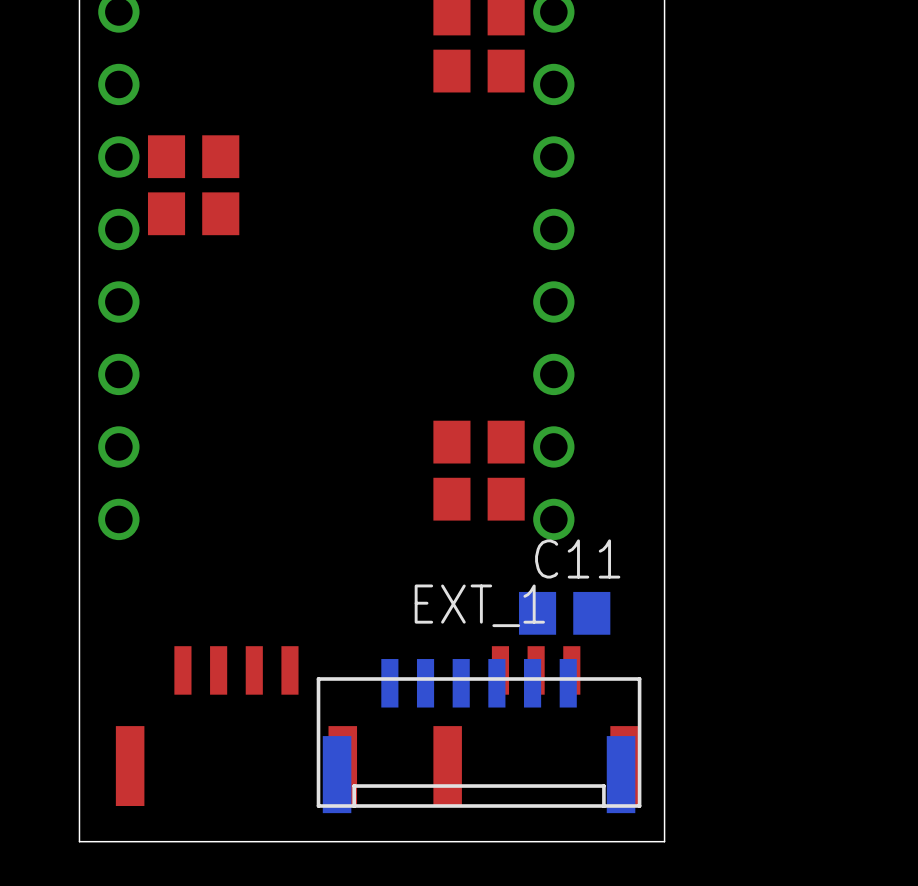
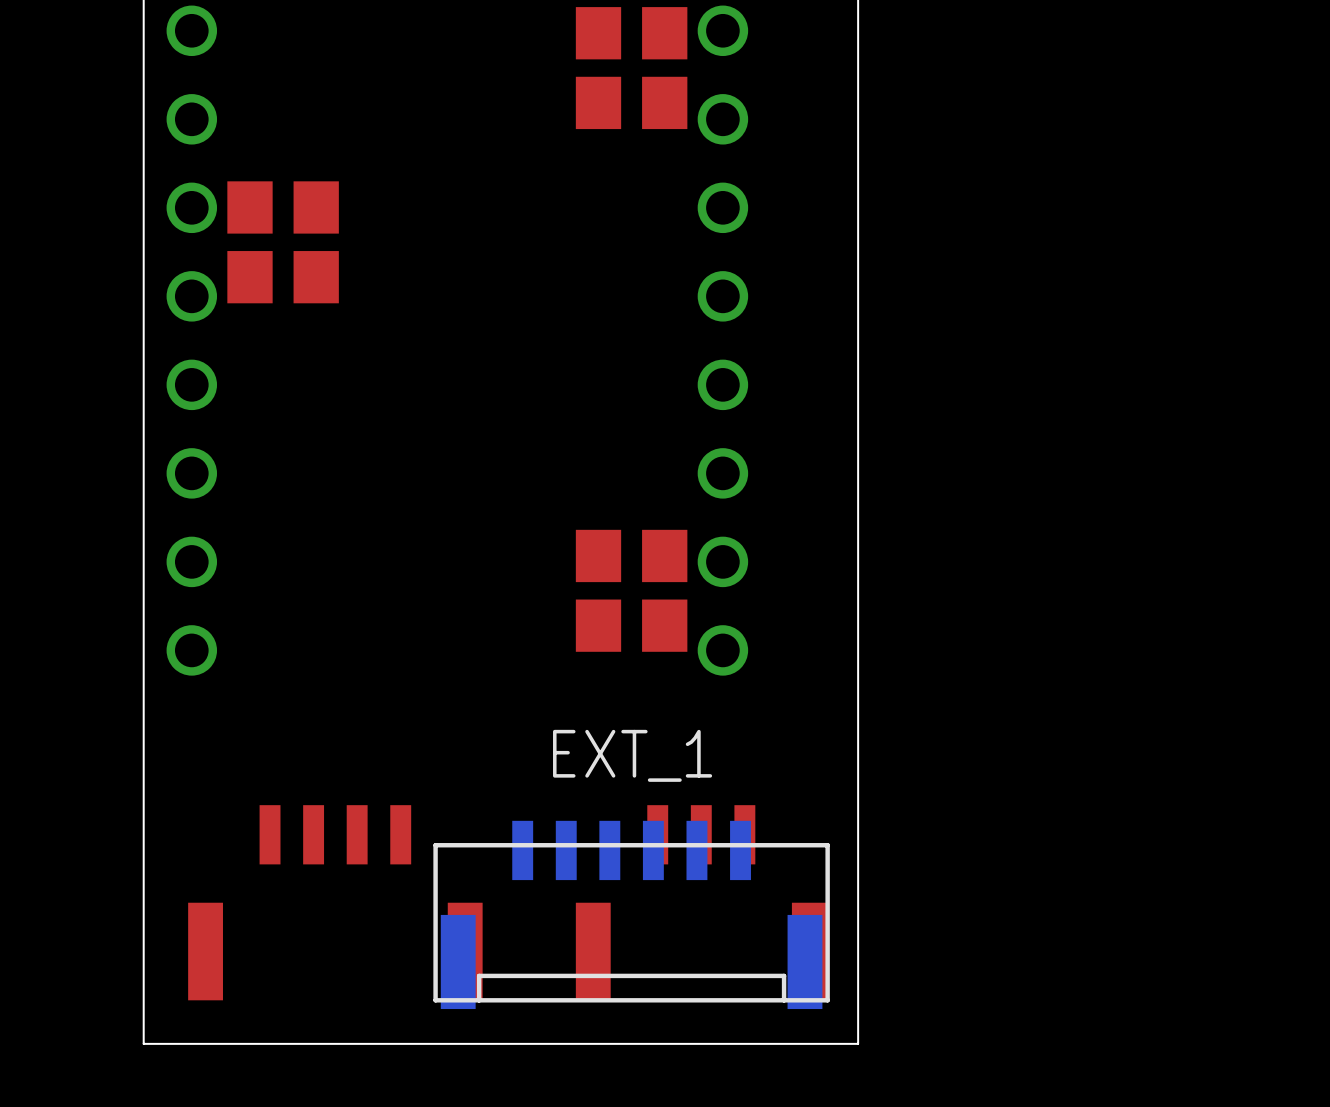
C11: (564, 613) -> none

